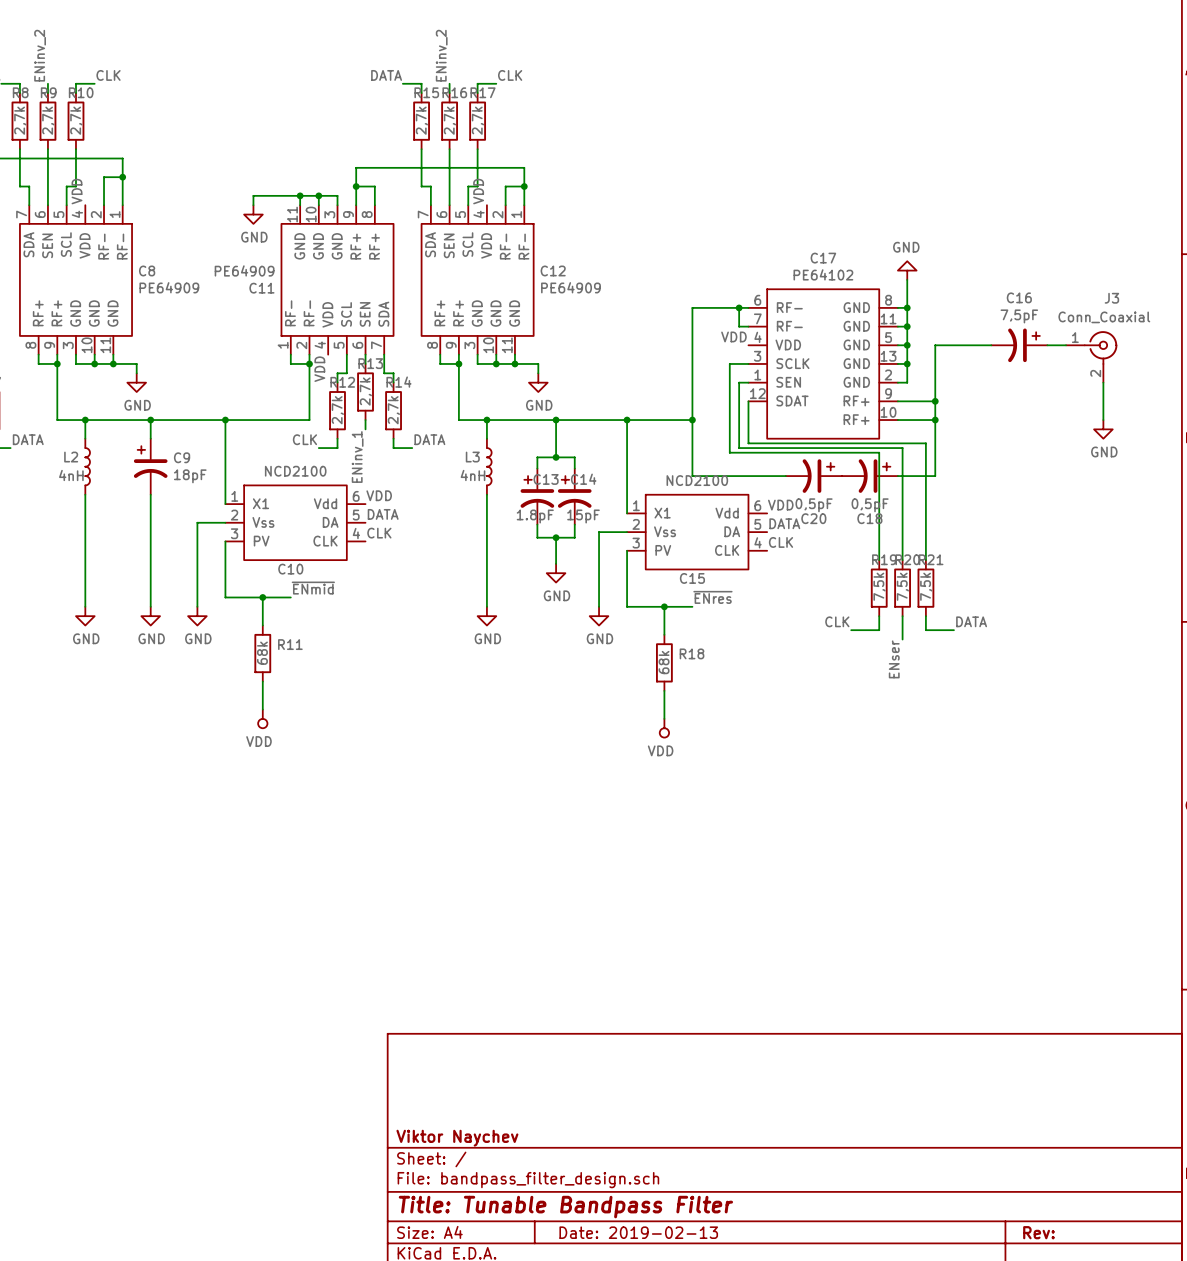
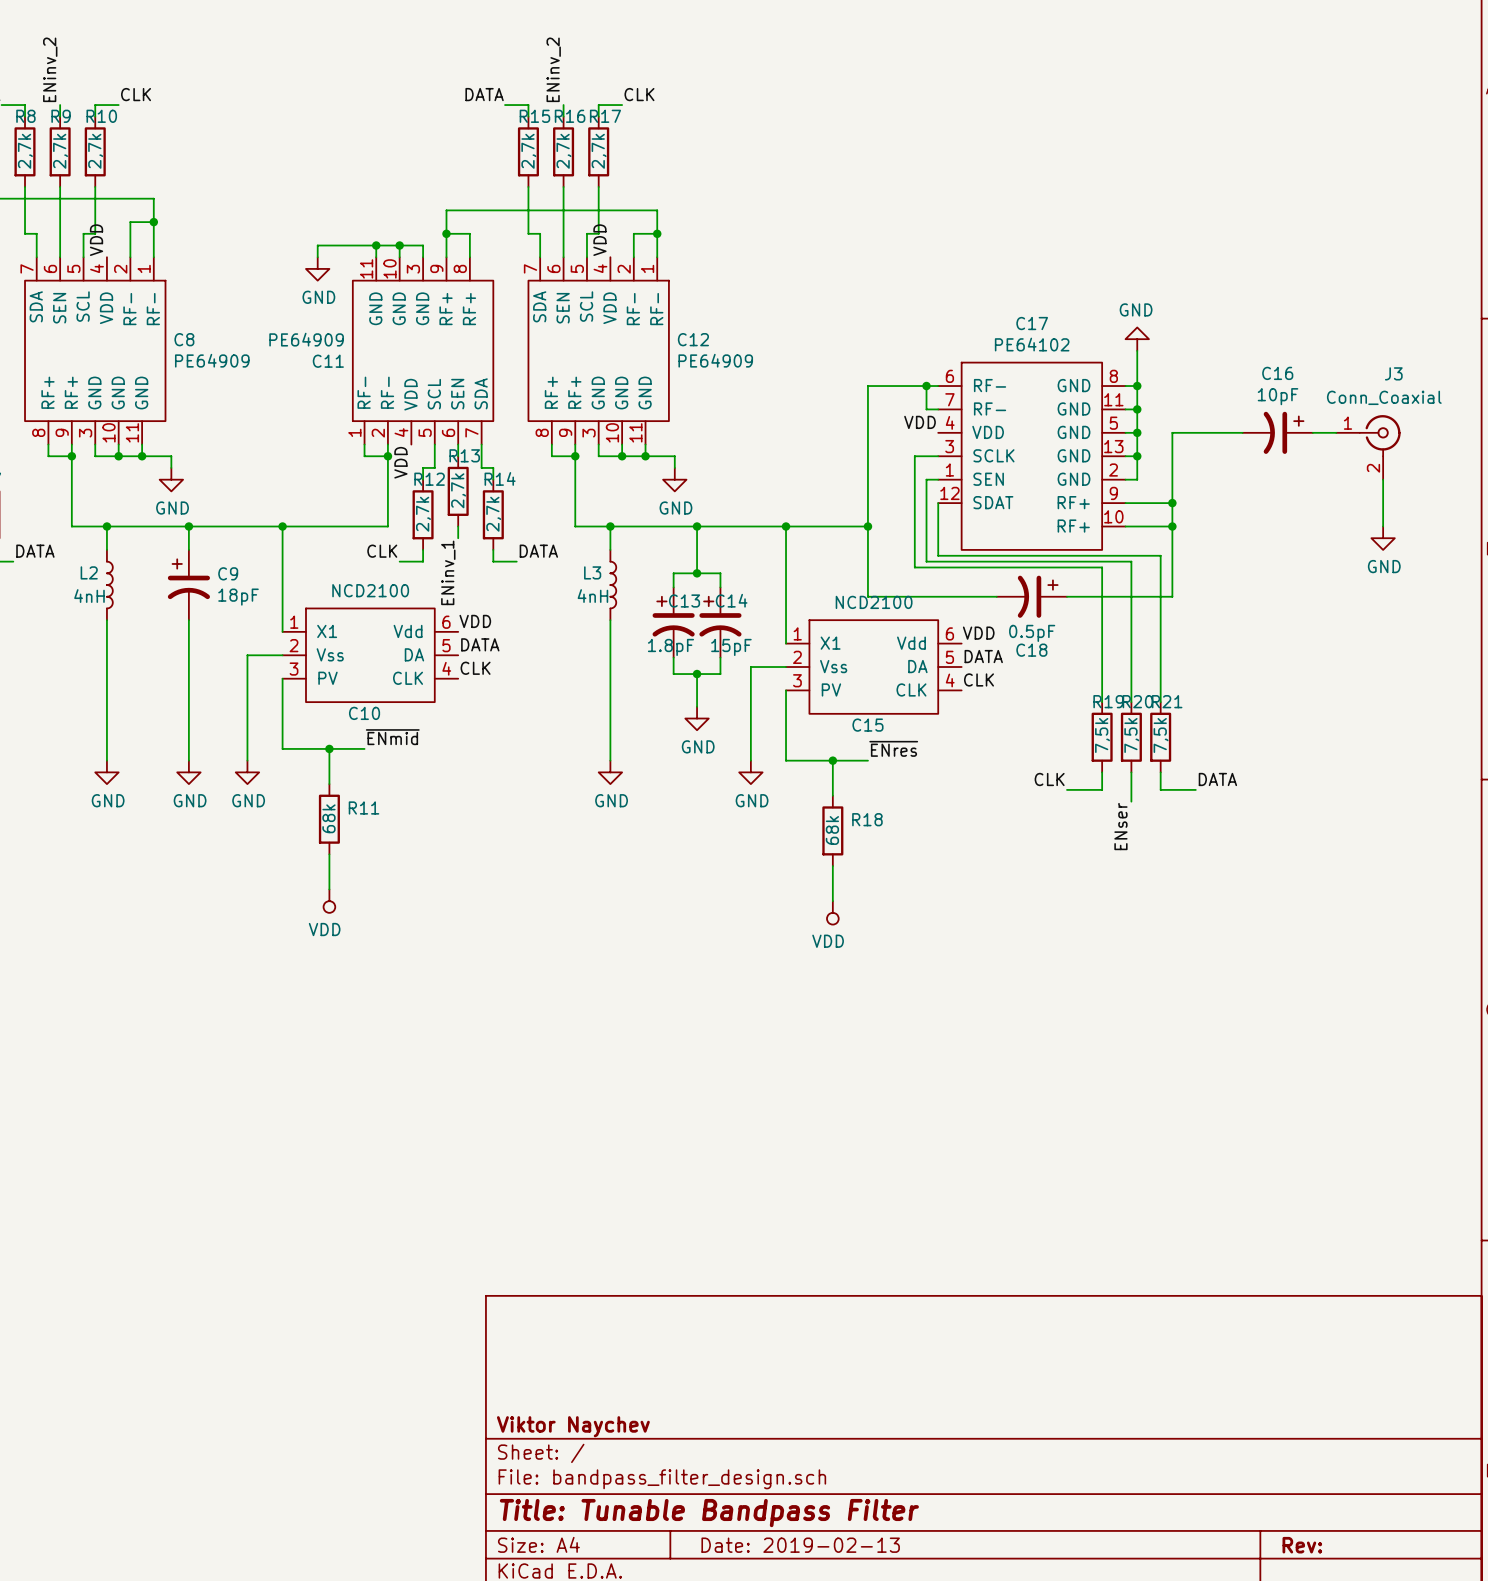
C16 value: 7,5pF (1019, 316) -> 10pF (1278, 396)
C20: 0,5pF (813, 476) -> none
C18 position: (869, 476) -> (1031, 596)
C18 value: 0,5pF (870, 505) -> 0.5pF (1032, 633)

